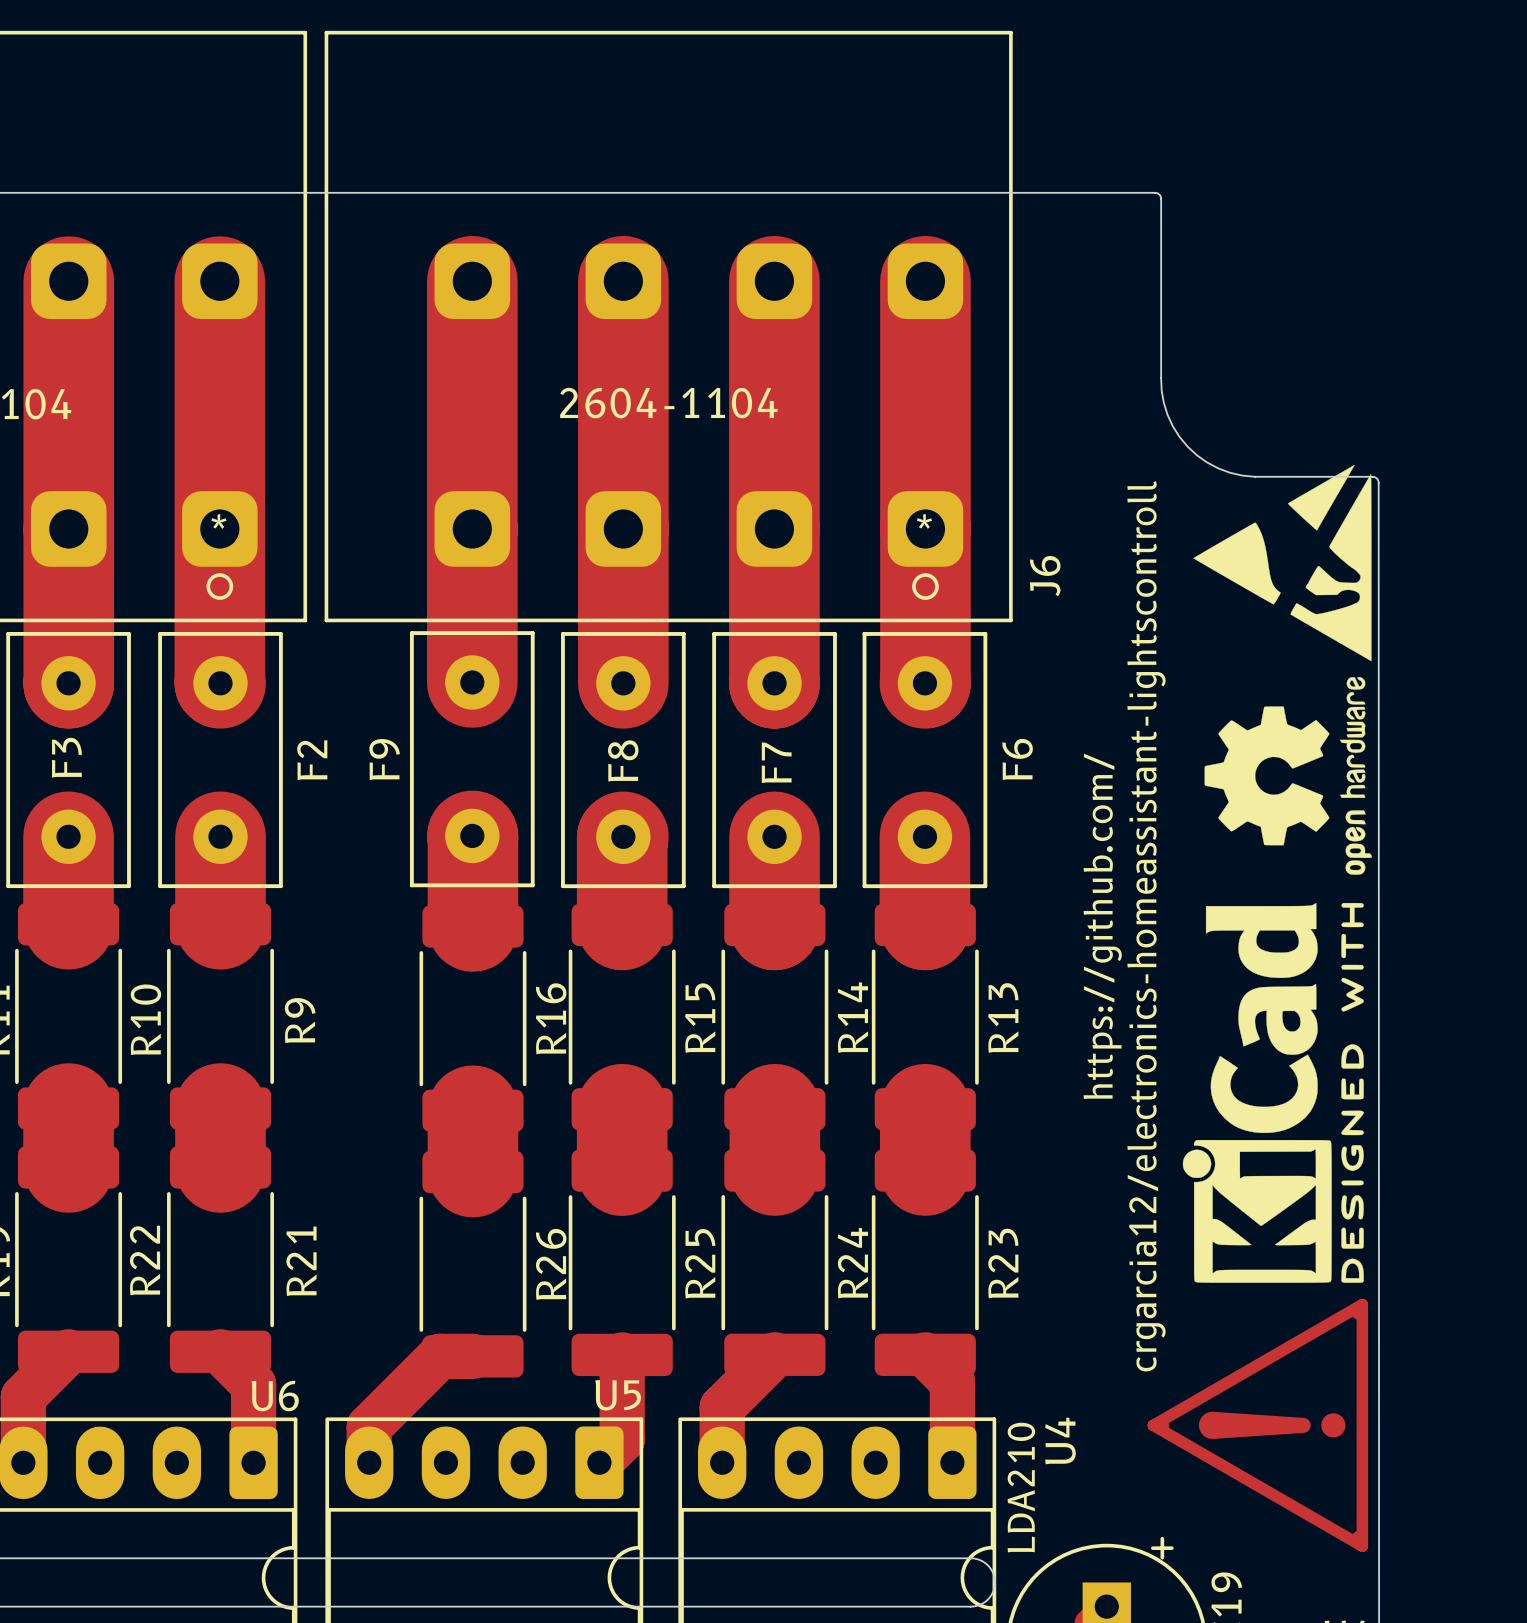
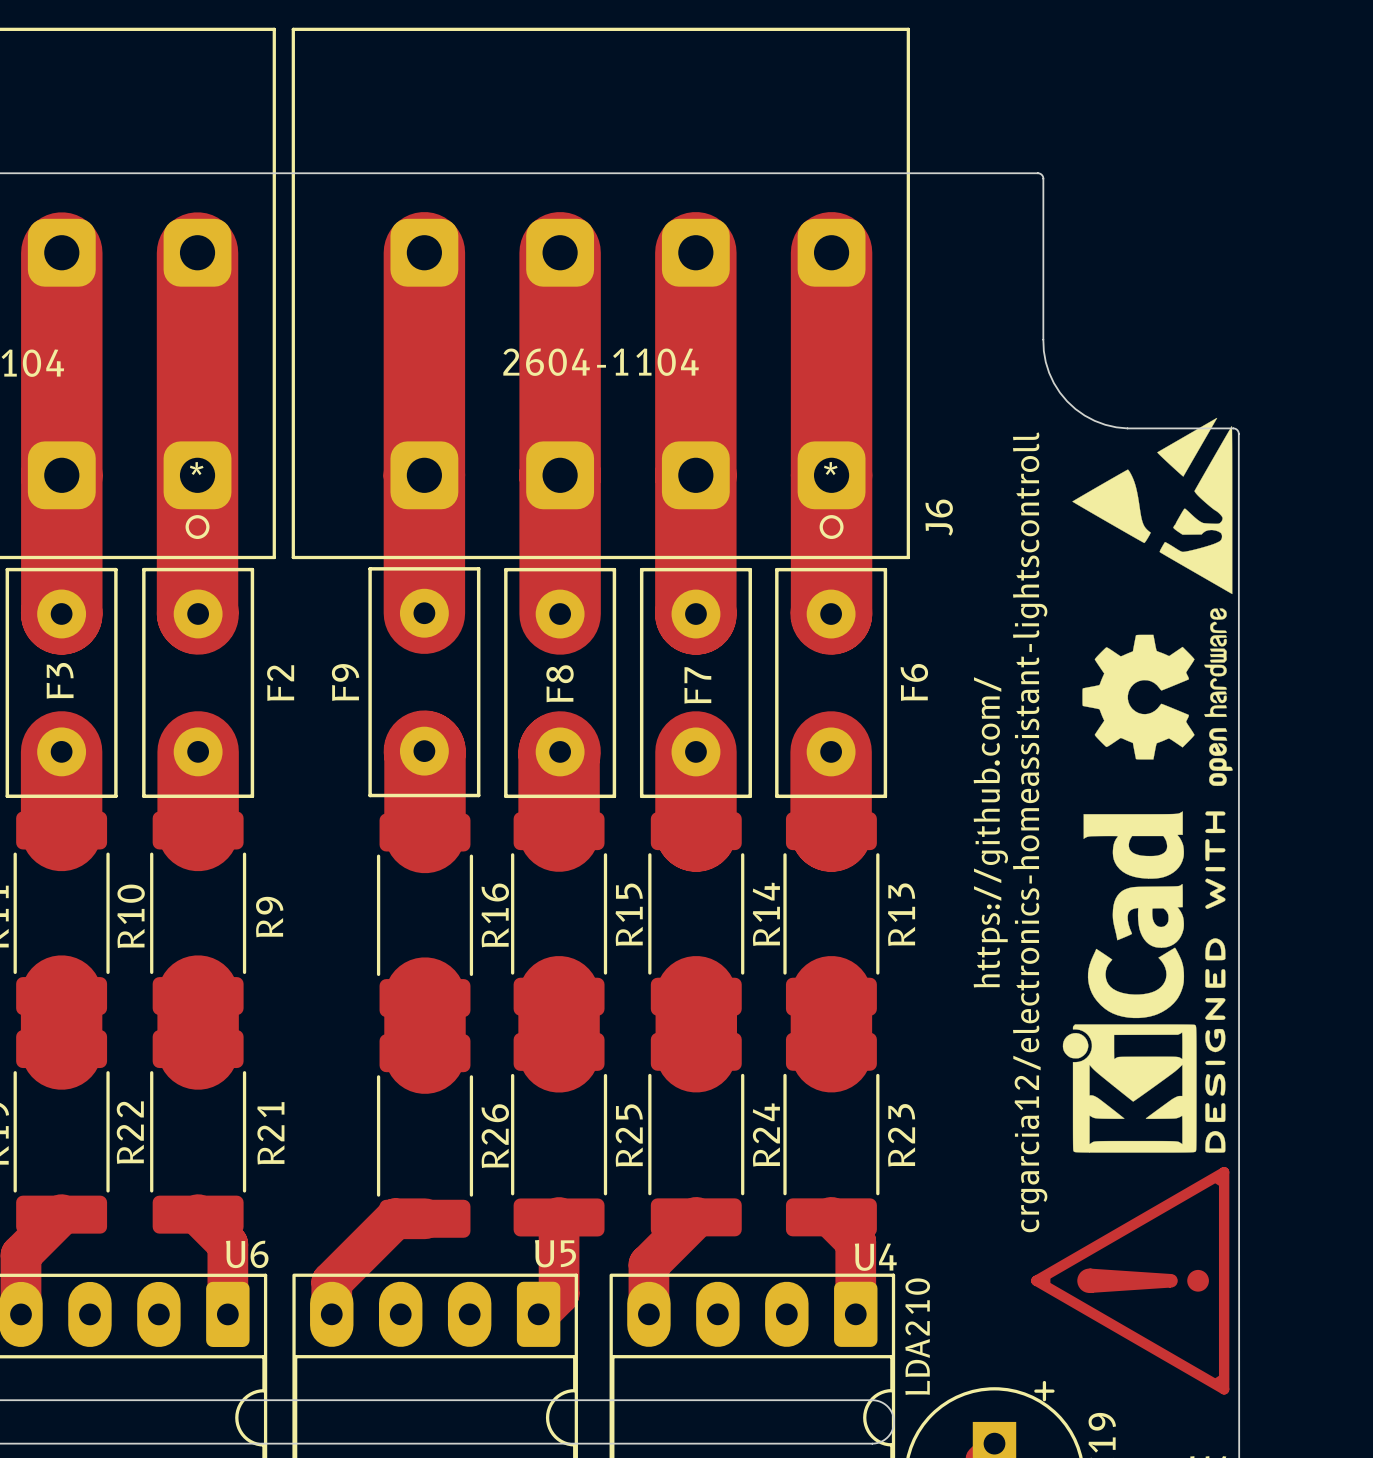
U4 name rotation: 0° (1060, 1440) -> 90° clockwise (875, 1257)
U4 name position: U4 (1060, 1440) -> U4 (875, 1257)

